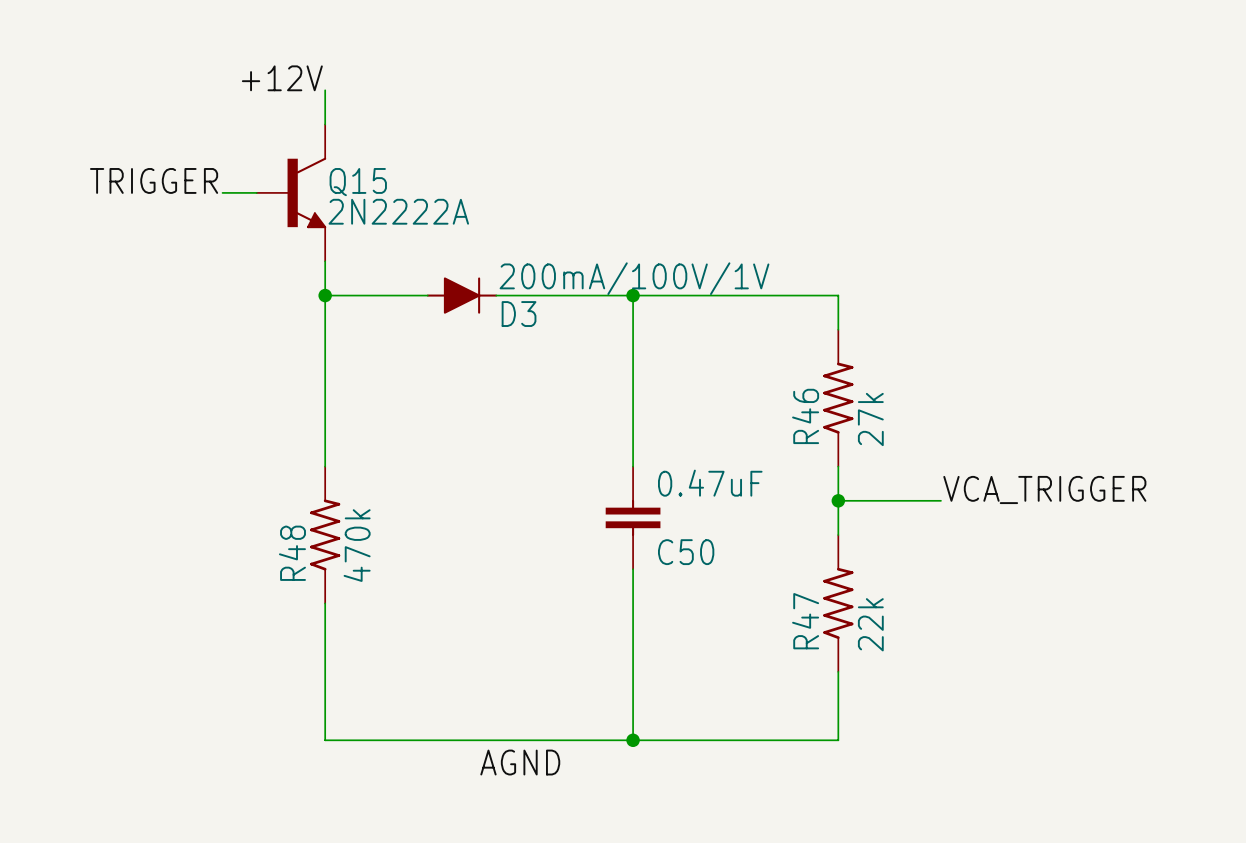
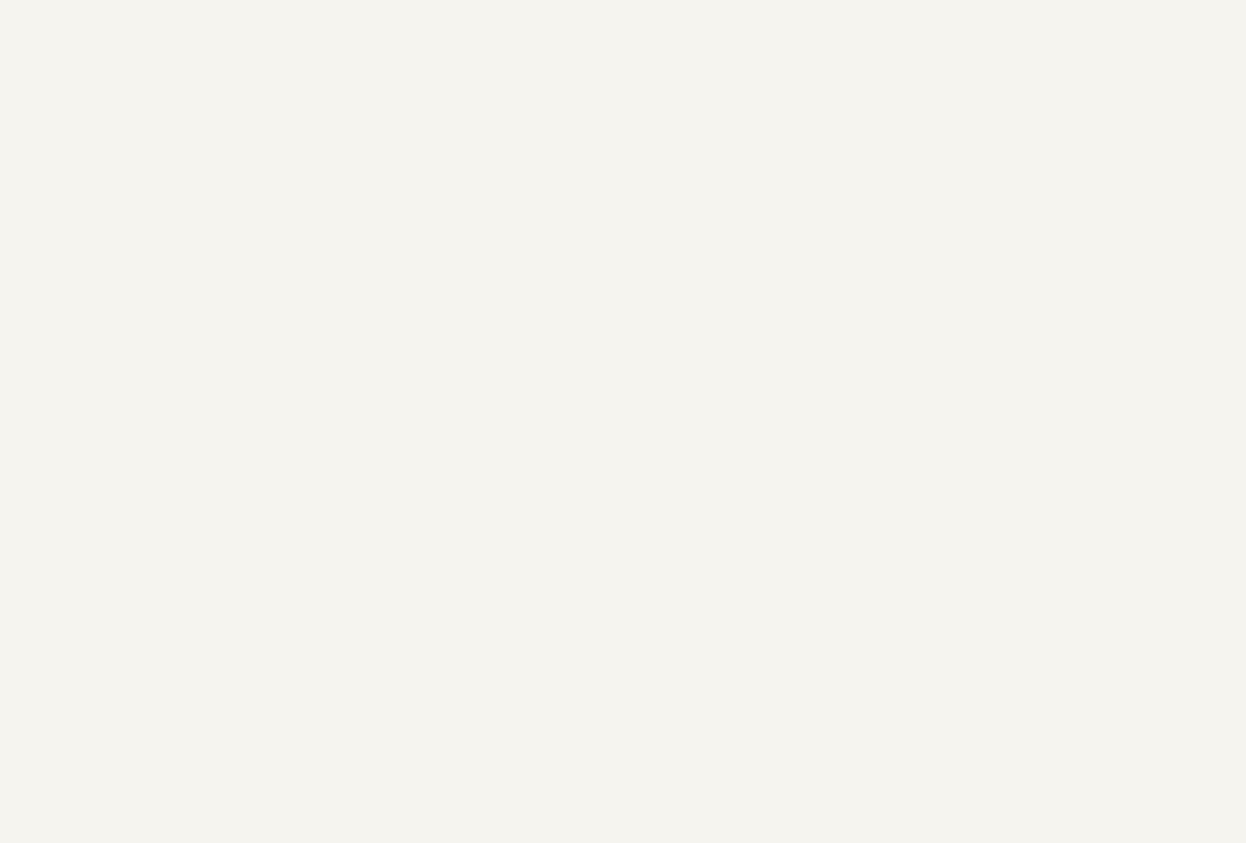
label: +12V (282, 78) -> none
wire: (325, 90) (325, 124) -> none
label: TRIGGER (154, 180) -> none
wire: (222, 192) (256, 192) -> none
Q15: 2N2222A (291, 192) -> none
wire: (325, 261) (325, 466) -> none
wire: (325, 295) (427, 295) -> none
junction: (325, 295) -> none
D3: 200mA/100V/1V (462, 295) -> none
wire: (496, 295) (838, 295) (838, 329) -> none
wire: (633, 295) (633, 466) -> none
junction: (633, 295) -> none
R46: 27k (838, 398) -> none
wire: (838, 466) (838, 535) -> none
label: VCA_TRIGGER (1044, 489) -> none
wire: (838, 500) (940, 500) -> none
junction: (838, 500) -> none
C50: 0.47uF (633, 517) -> none
R48: 470k (325, 535) -> none
wire: (633, 569) (633, 740) -> none
wire: (325, 603) (325, 740) (838, 740) (838, 671) -> none
R47: 22k (838, 603) -> none
junction: (633, 740) -> none
label: AGND (520, 762) -> none

